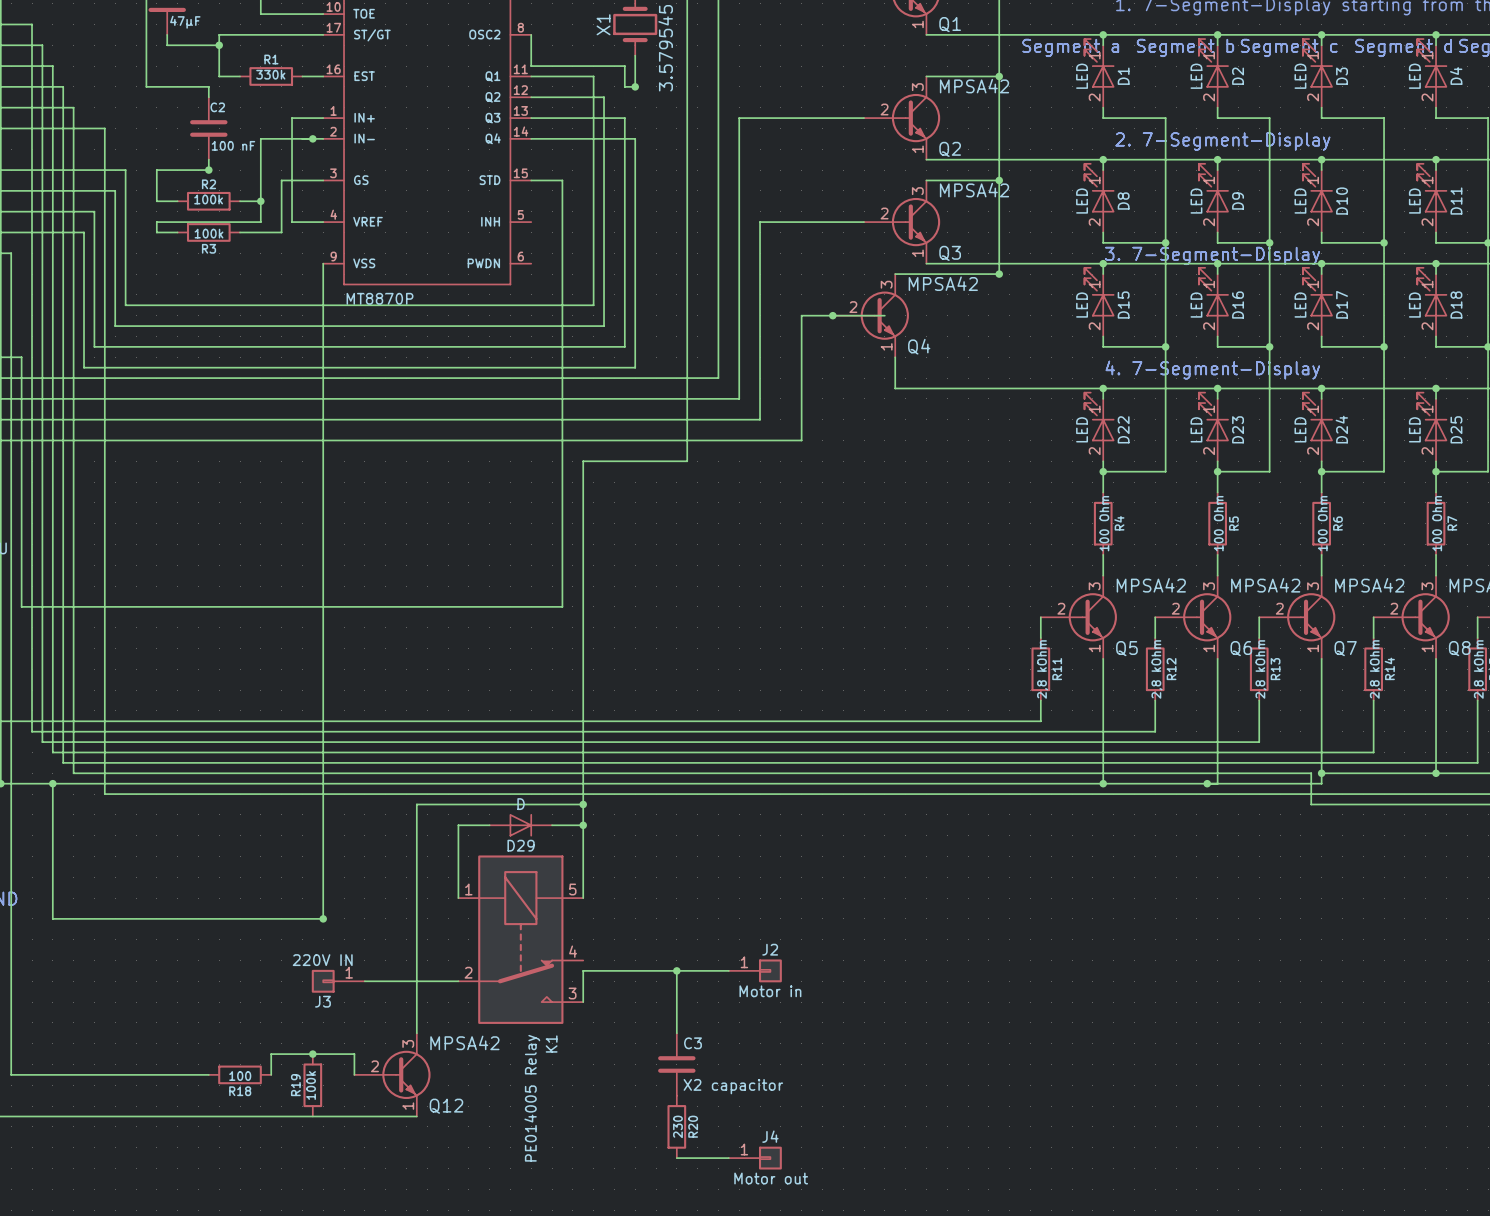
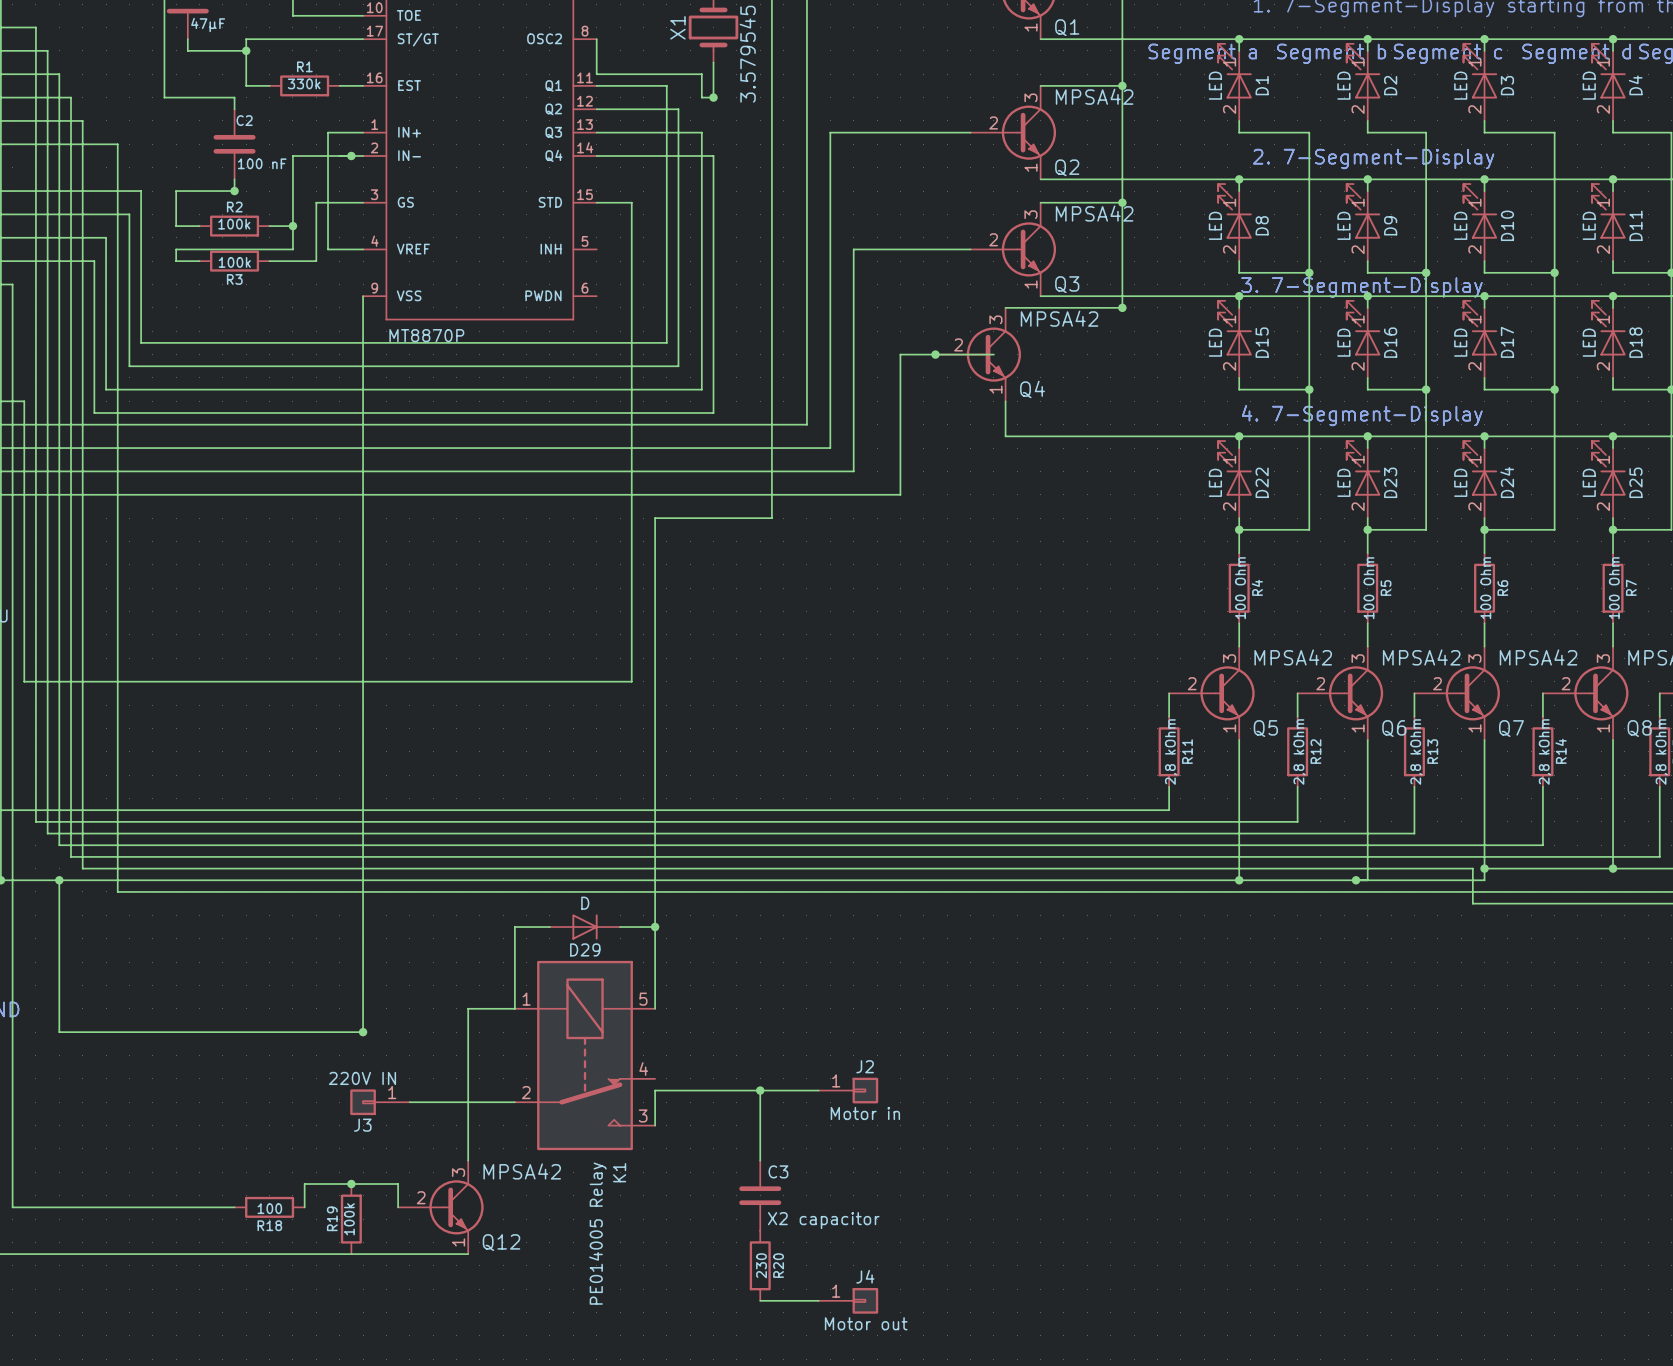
wire: (583, 804) (416, 804) (416, 898) -> (514, 1008) (468, 1008)
junction: (583, 804) -> none

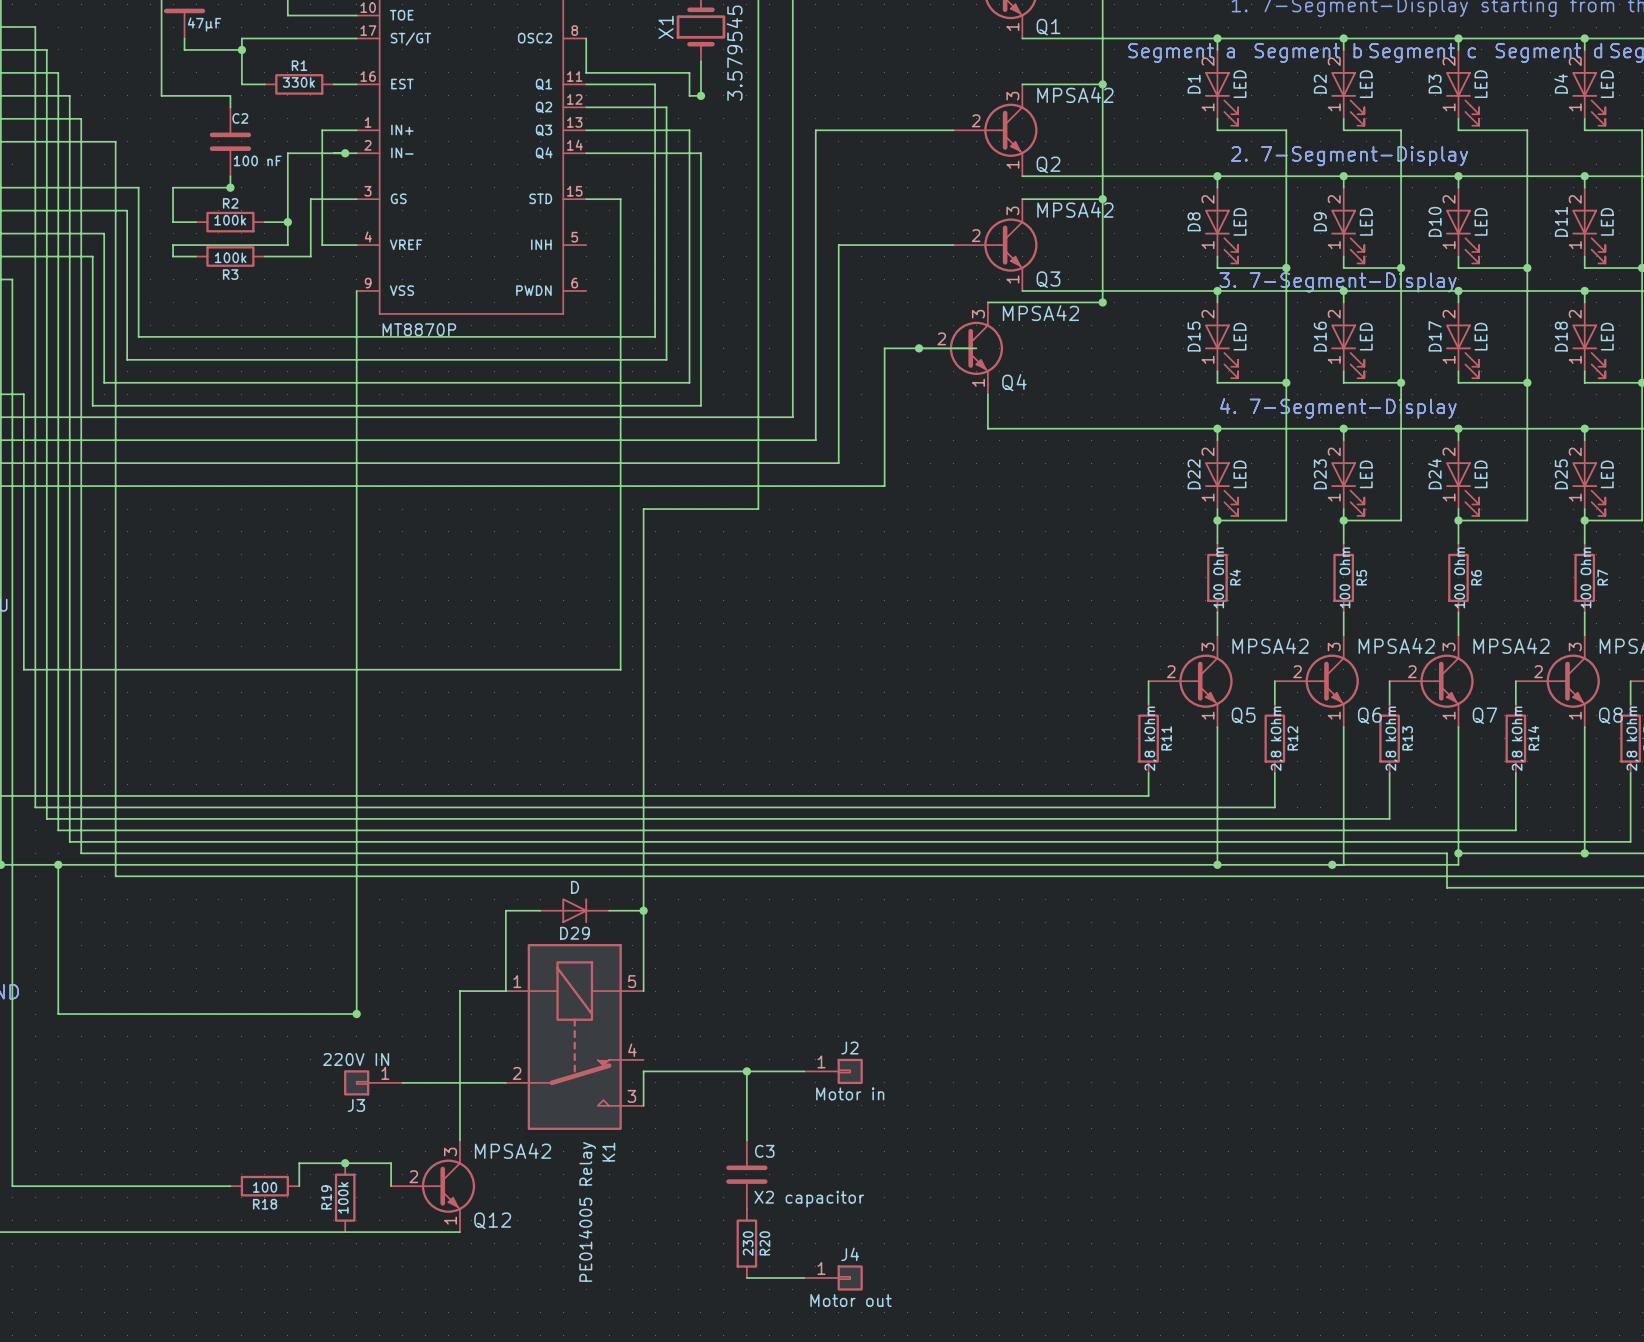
D1 rotation: 0° (1235, 71) -> 180° (1221, 98)
D2 rotation: 0° (1363, 71) -> 180° (1347, 98)
D3 rotation: 0° (1480, 71) -> 180° (1462, 98)
D4 rotation: 0° (1608, 71) -> 180° (1588, 98)
D8 rotation: 0° (1235, 211) -> 180° (1221, 236)
D9 rotation: 0° (1363, 211) -> 180° (1347, 236)
D10 rotation: 0° (1480, 211) -> 180° (1462, 236)
D11 rotation: 0° (1608, 211) -> 180° (1588, 236)
D15 rotation: 0° (1235, 328) -> 180° (1221, 351)
D16 rotation: 0° (1363, 328) -> 180° (1347, 351)
D17 rotation: 0° (1480, 328) -> 180° (1462, 351)
D18 rotation: 0° (1608, 328) -> 180° (1588, 351)
D22 rotation: 0° (1235, 468) -> 180° (1221, 489)
D23 rotation: 0° (1363, 468) -> 180° (1347, 489)
D24 rotation: 0° (1480, 468) -> 180° (1462, 489)
D25 rotation: 0° (1608, 468) -> 180° (1588, 489)

